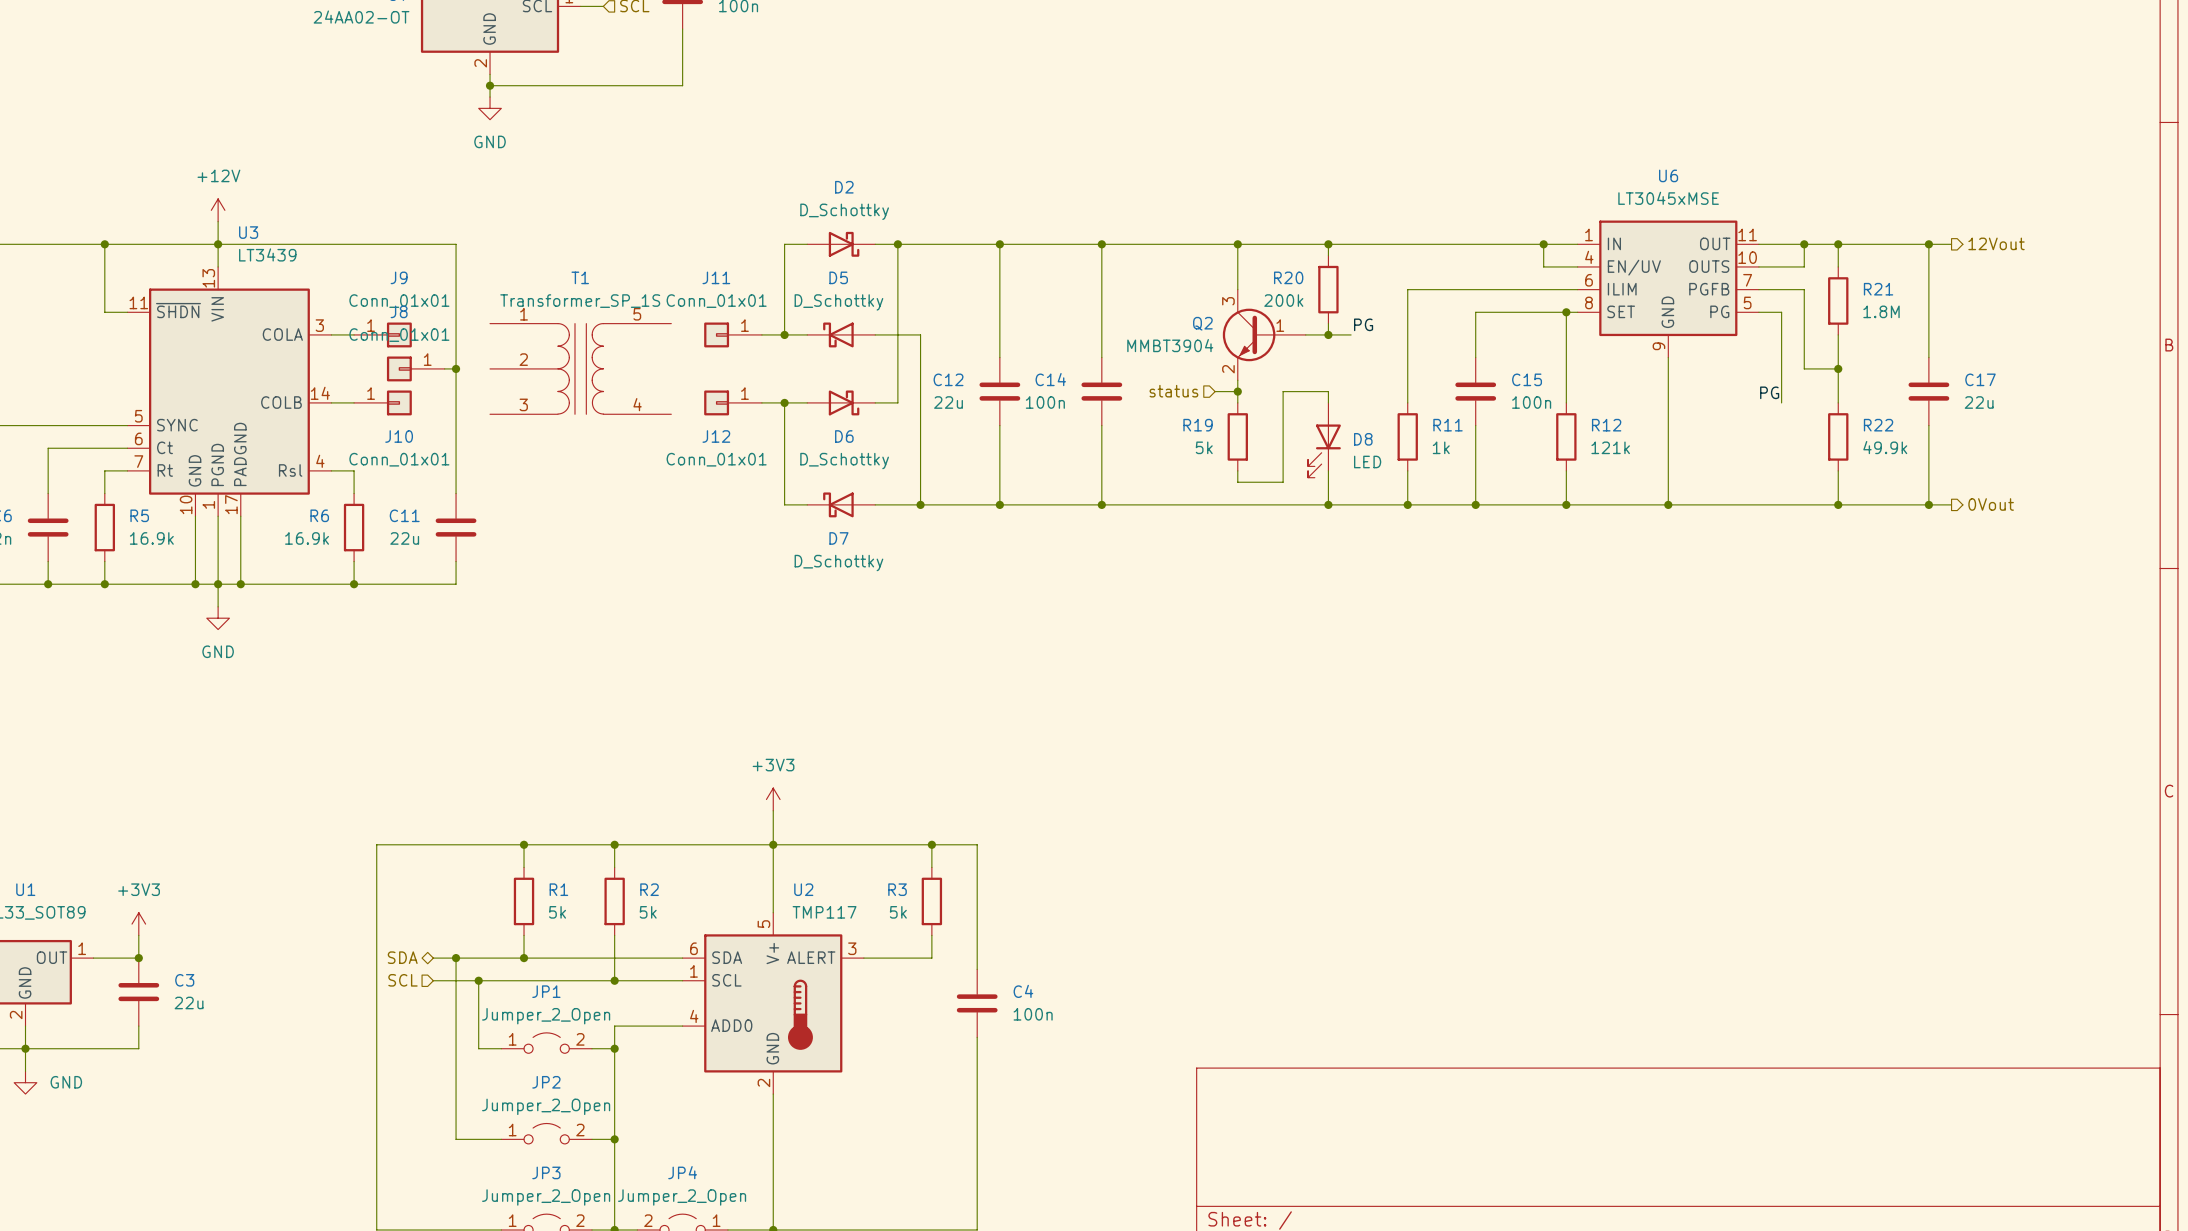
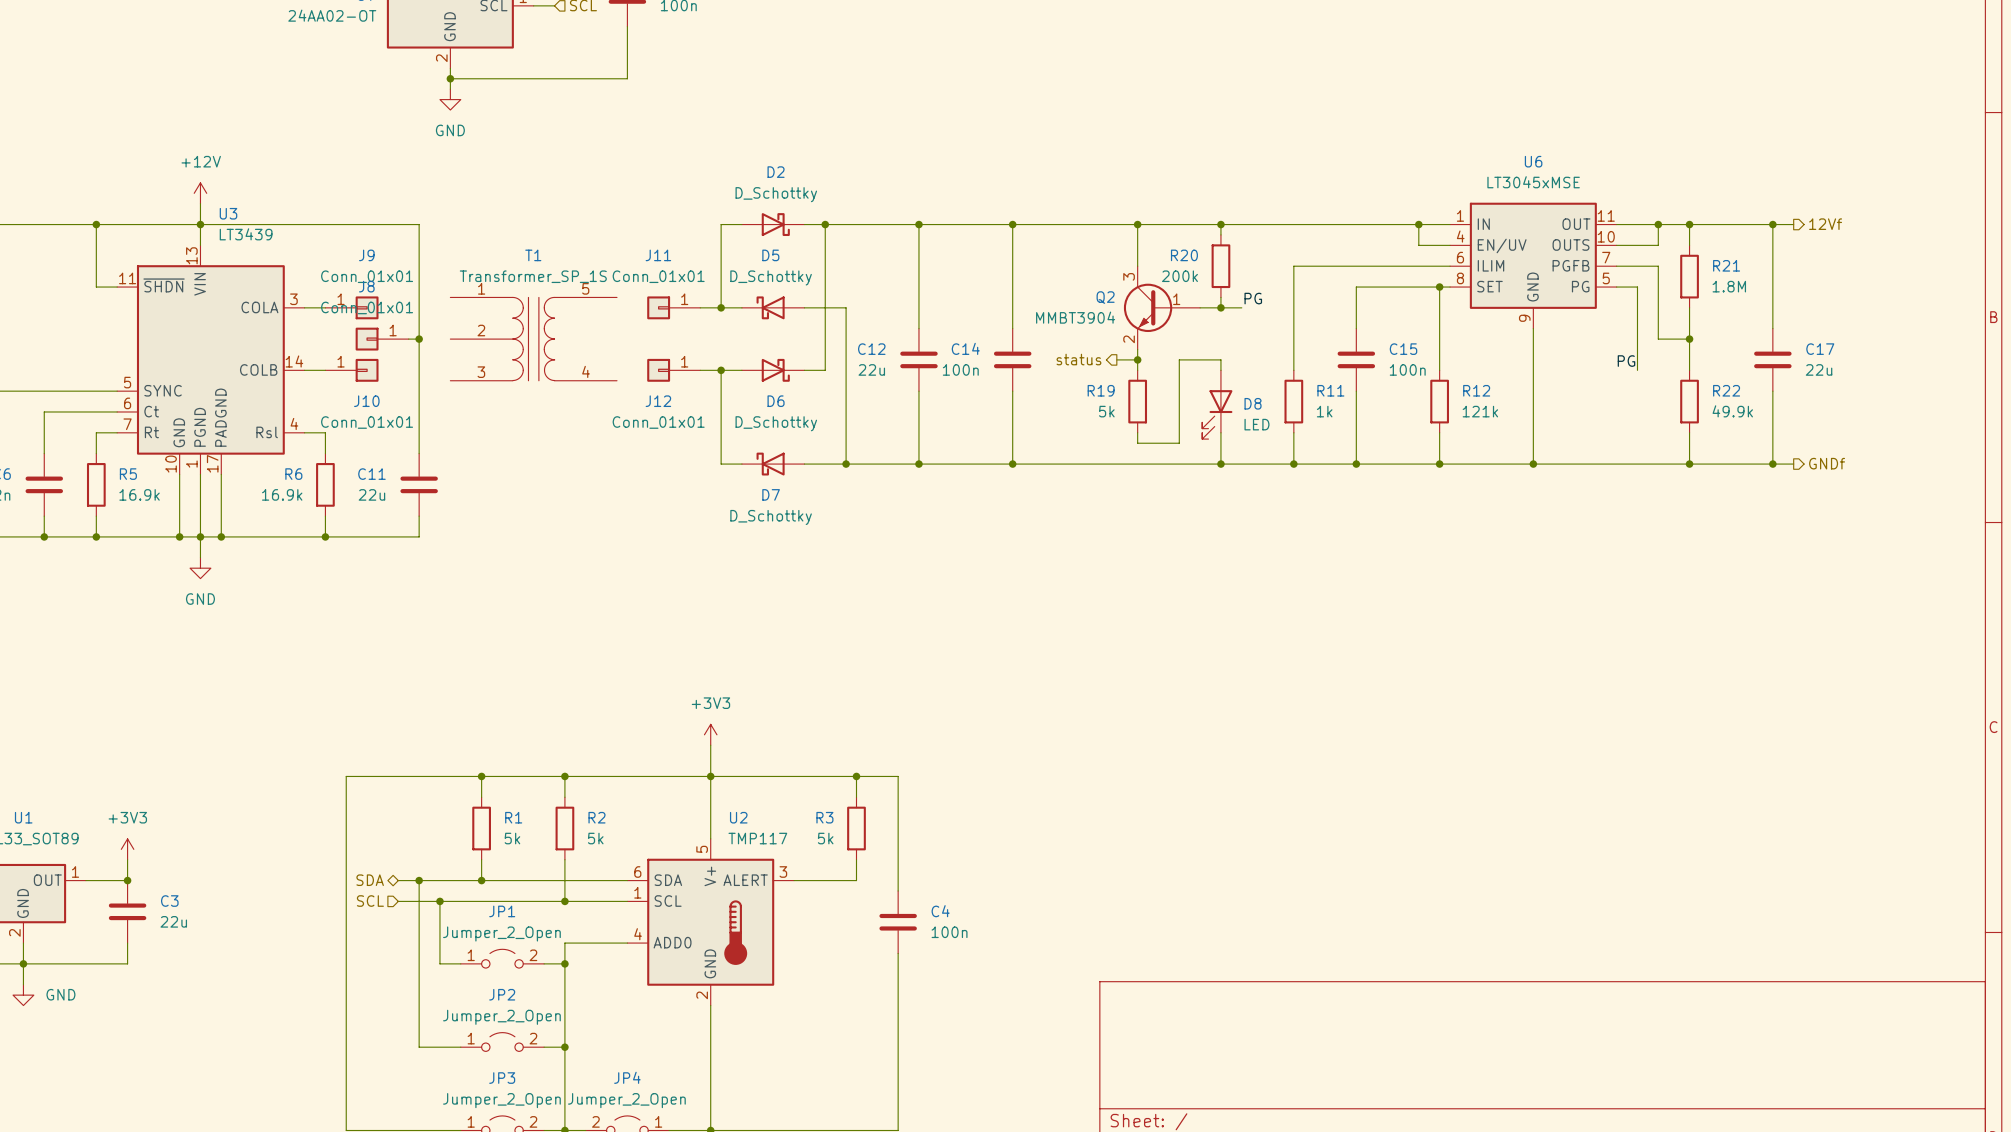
hierarchical label: 12Vout (1996, 243) -> 12Vf (1825, 224)
hierarchical label shape: input (1173, 391) -> output (1078, 359)
hierarchical label: 0Vout (1991, 504) -> GNDf (1827, 463)

